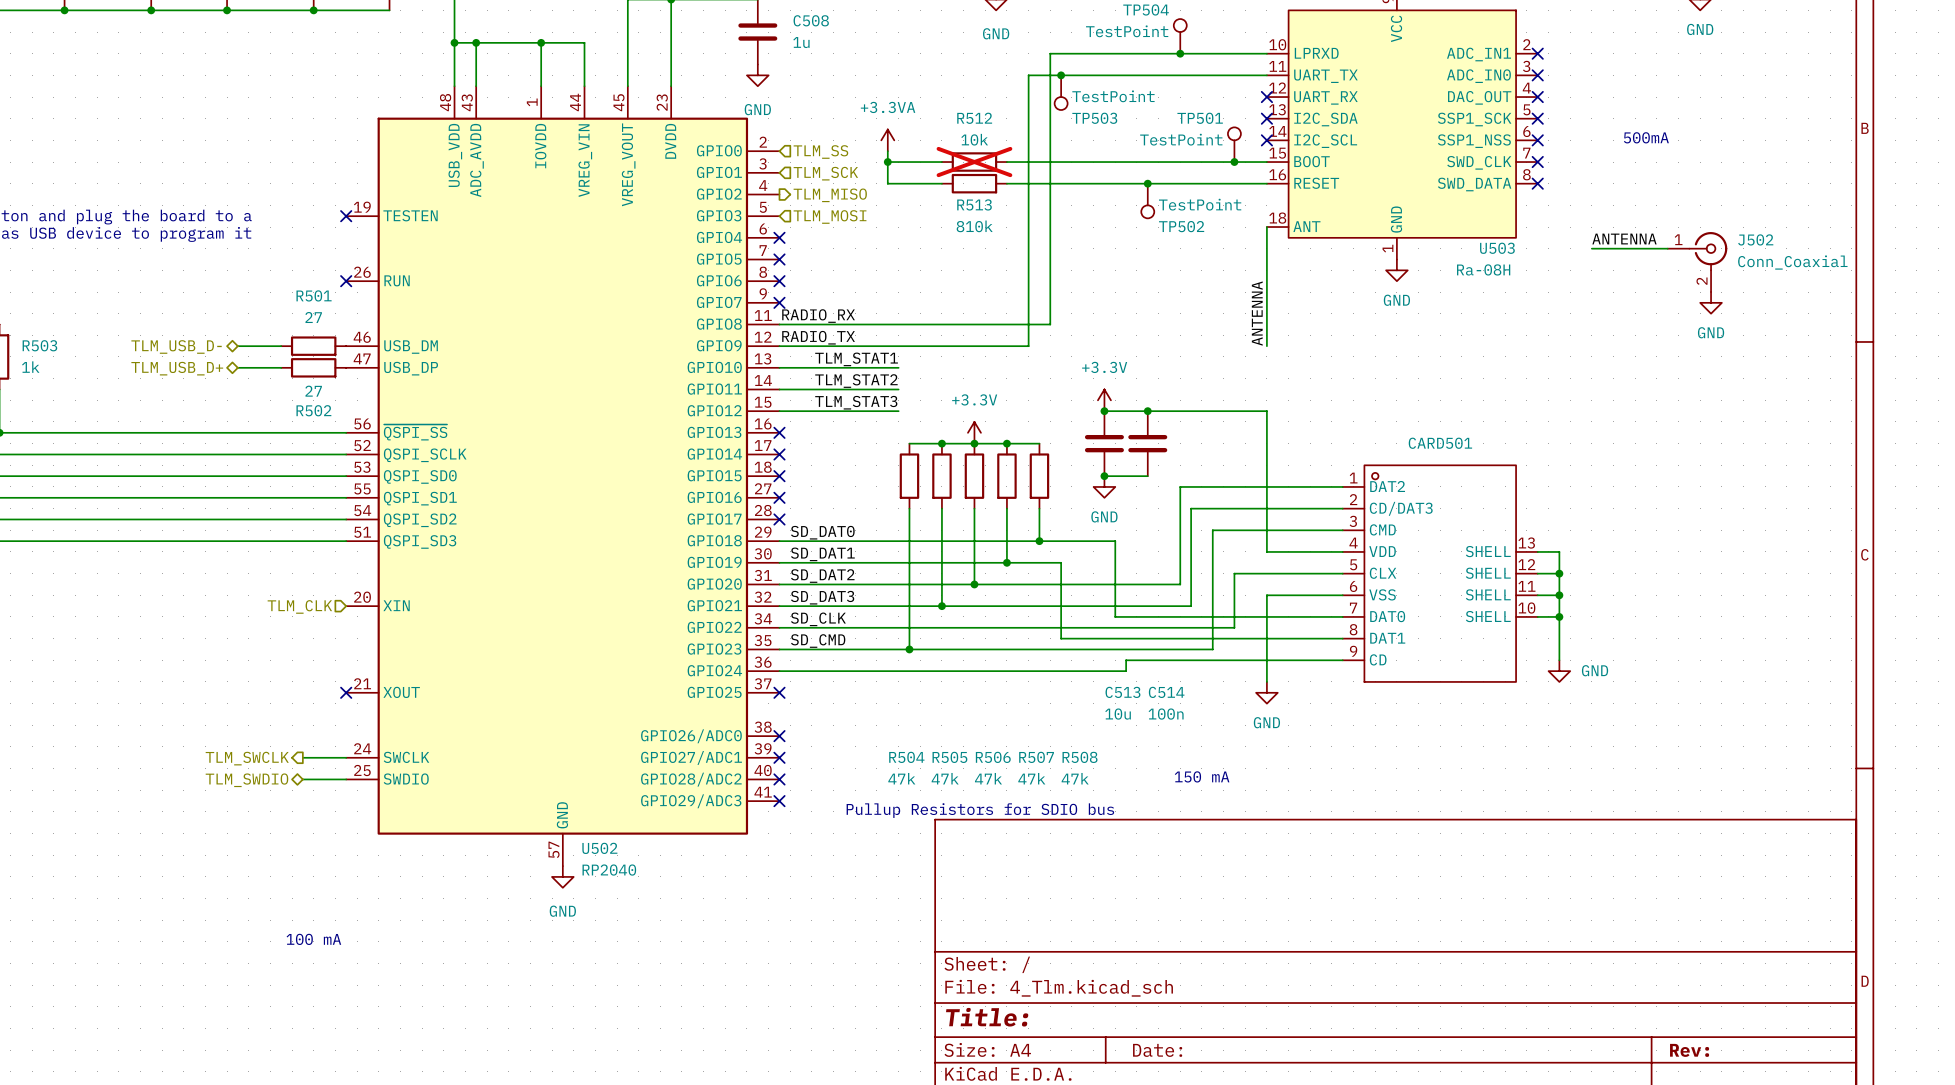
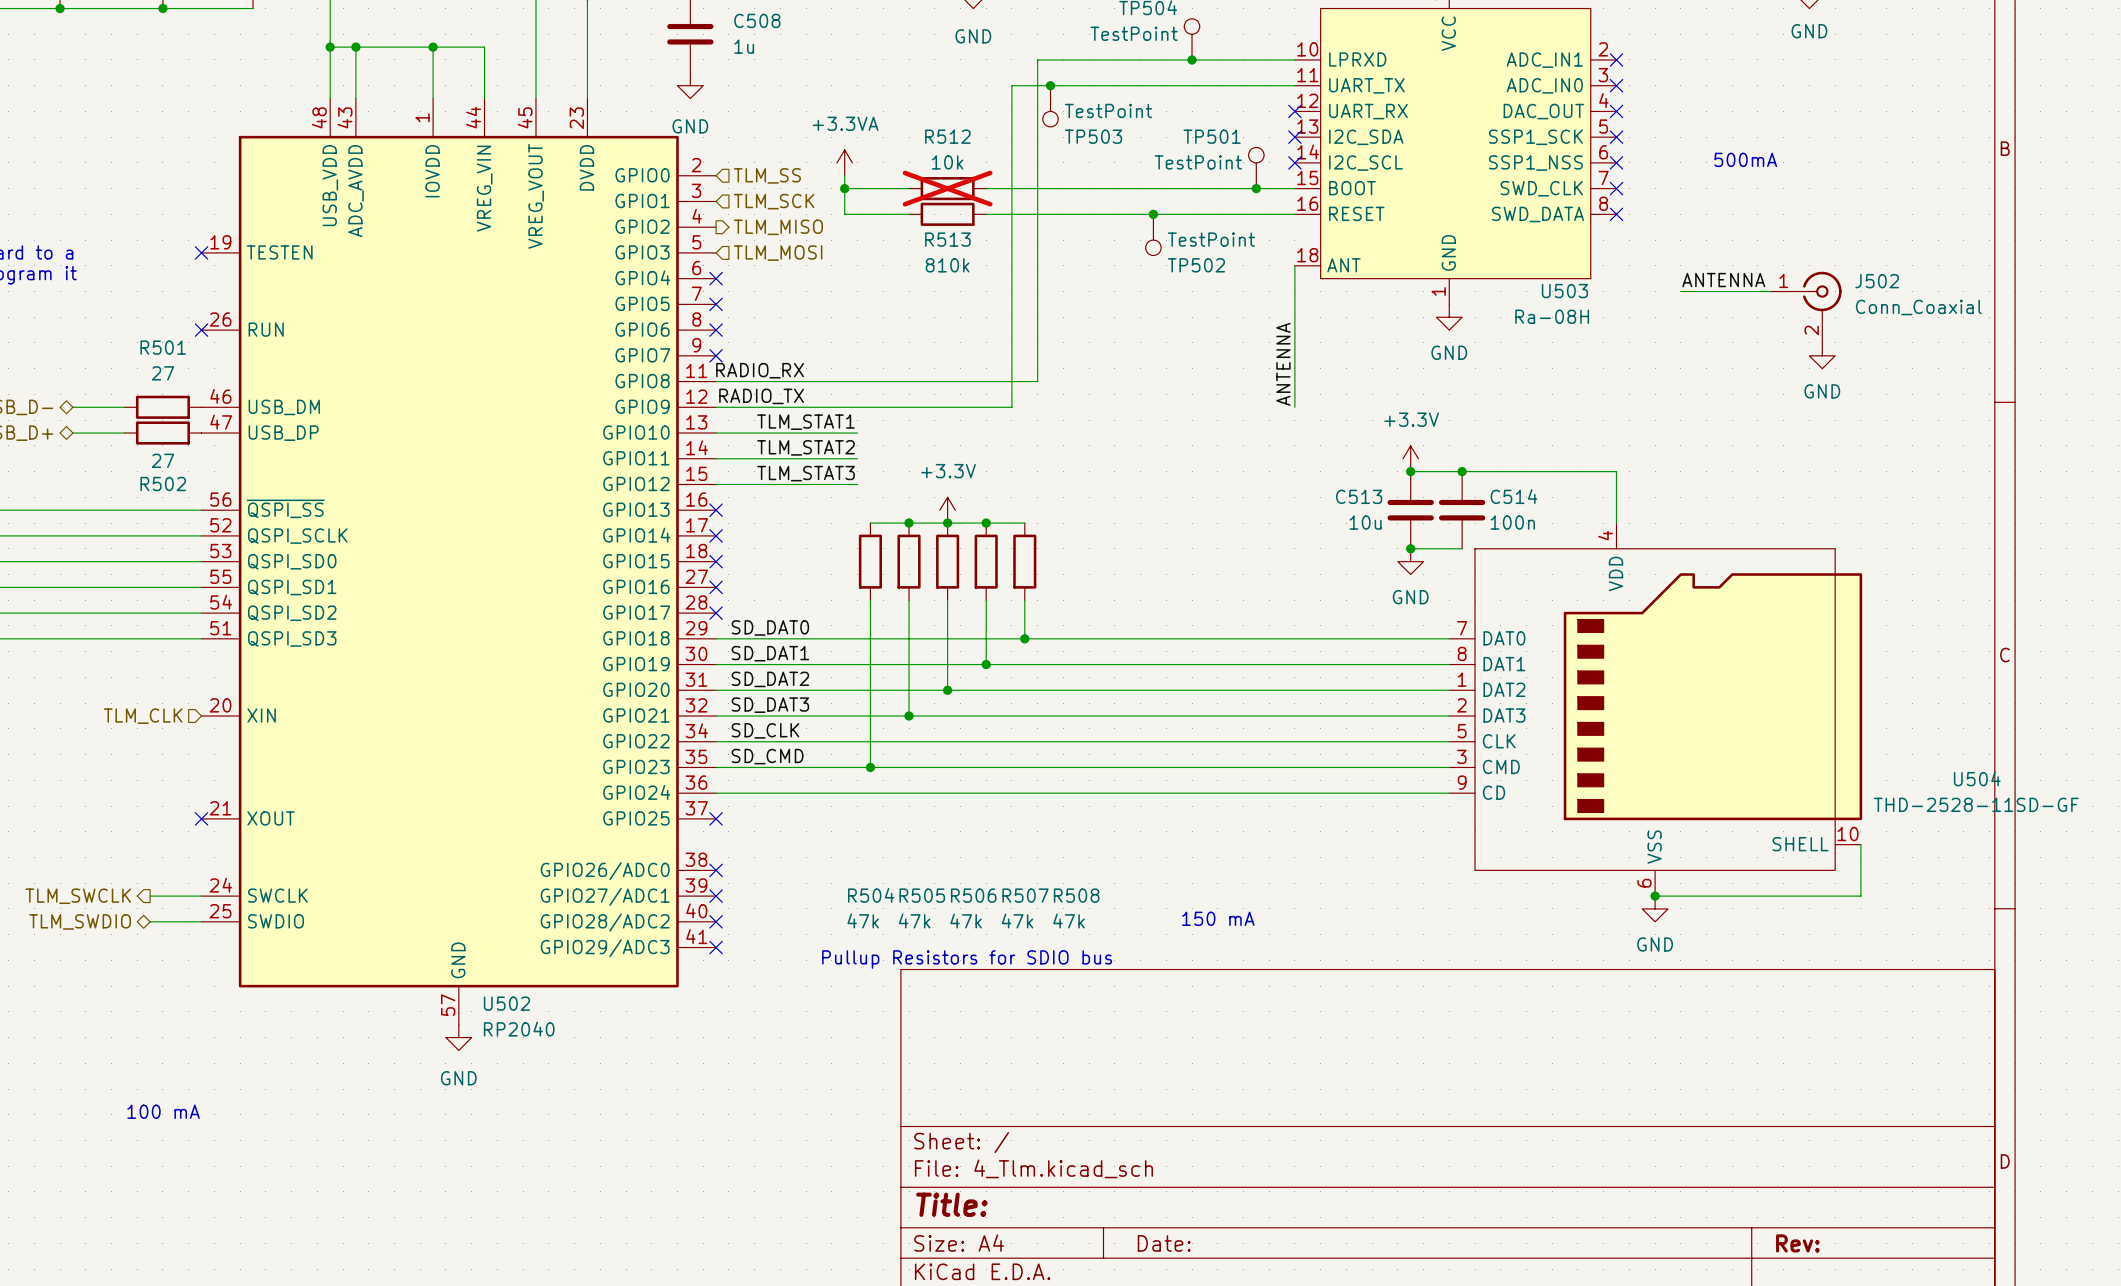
power symbol: none -> +3.3V (1410, 458)
power symbol: +3.3V (1104, 400) -> none
wire: none -> (1410, 471) (1616, 471) (1616, 523)
junction: none -> (1410, 471)
junction: none -> (1462, 471)
wire: (1104, 411) (1266, 411) (1266, 551) (1342, 551) -> none
junction: (1104, 411) -> none
junction: (1147, 411) -> none
C513 position: (1104, 443) -> (1410, 510)
C514 position: (1147, 443) -> (1462, 510)
junction: none -> (1410, 548)
wire: (1104, 476) (1147, 476) -> none
junction: (1104, 476) -> none
power symbol: none -> GND (1410, 561)
power symbol: GND (1104, 486) -> none
wire: (1342, 486) (1180, 486) (1180, 584) -> (1449, 690) (1192, 690)
wire: (1342, 508) (1191, 508) (1191, 606) -> (1449, 716) (1204, 716)
wire: (1342, 530) (1212, 530) (1212, 649) -> (1449, 767) (1230, 767)
wire: (1115, 541) (1115, 616) (1342, 616) -> (1114, 638) (1449, 638)
wire: (1061, 562) (1061, 638) (1342, 638) -> (1050, 664) (1449, 664)
wire: (1342, 573) (1234, 573) (1234, 627) -> (1449, 741) (1256, 741)
CARD501: (1440, 573) -> none
junction: (1559, 573) -> none
wire: (1342, 595) (1266, 595) (1266, 681) -> none
junction: (1559, 595) -> none
U504: none -> THD-2528-11SD-GF (1655, 709)
junction: (1559, 616) -> none
wire: (1342, 660) (1126, 660) (1126, 671) -> (1449, 793) (1127, 793)
power symbol text position: GND (1595, 670) -> GND (1655, 944)
power symbol position: GND (1559, 671) -> GND (1655, 908)
C513 name position: C513 (1122, 692) -> C513 (1359, 496)
C514 name position: C514 (1166, 692) -> C514 (1513, 496)
power symbol: GND (1266, 692) -> none
C513 value position: 10u (1118, 714) -> 10u (1365, 522)
C514 value position: 100n (1166, 714) -> 100n (1512, 522)
wire: none -> (1860, 844) (1860, 896) (1655, 896)
junction: none -> (1655, 896)

